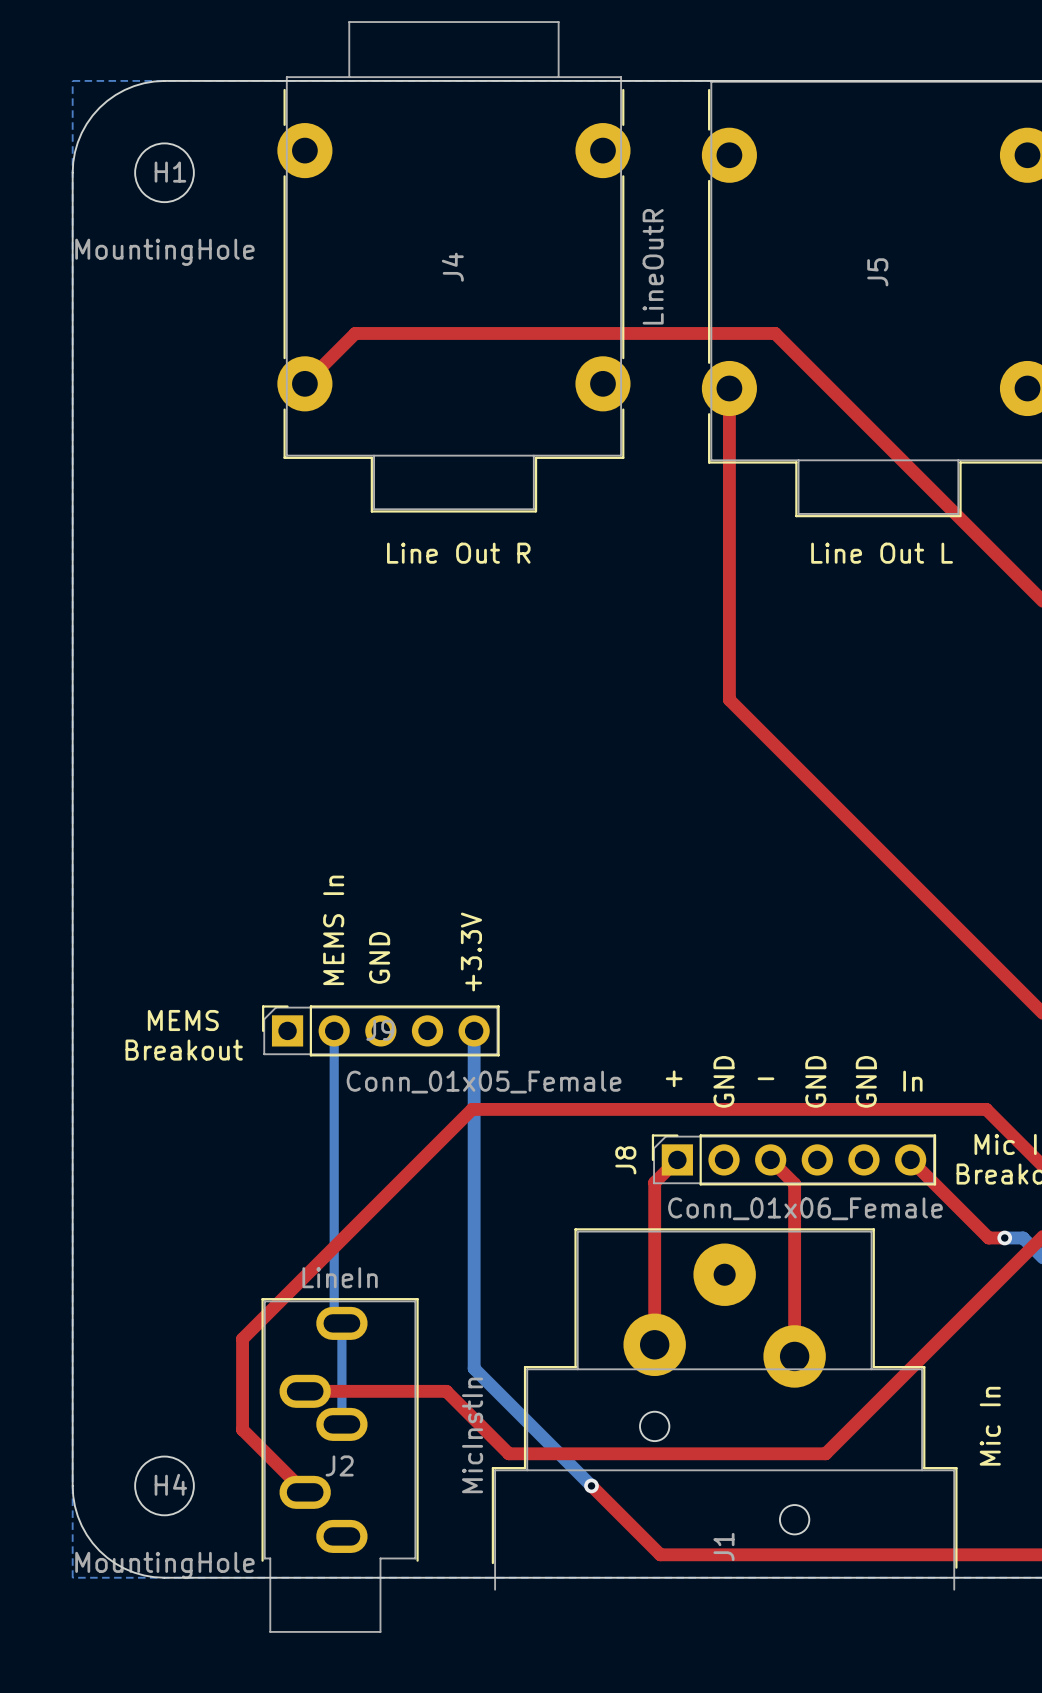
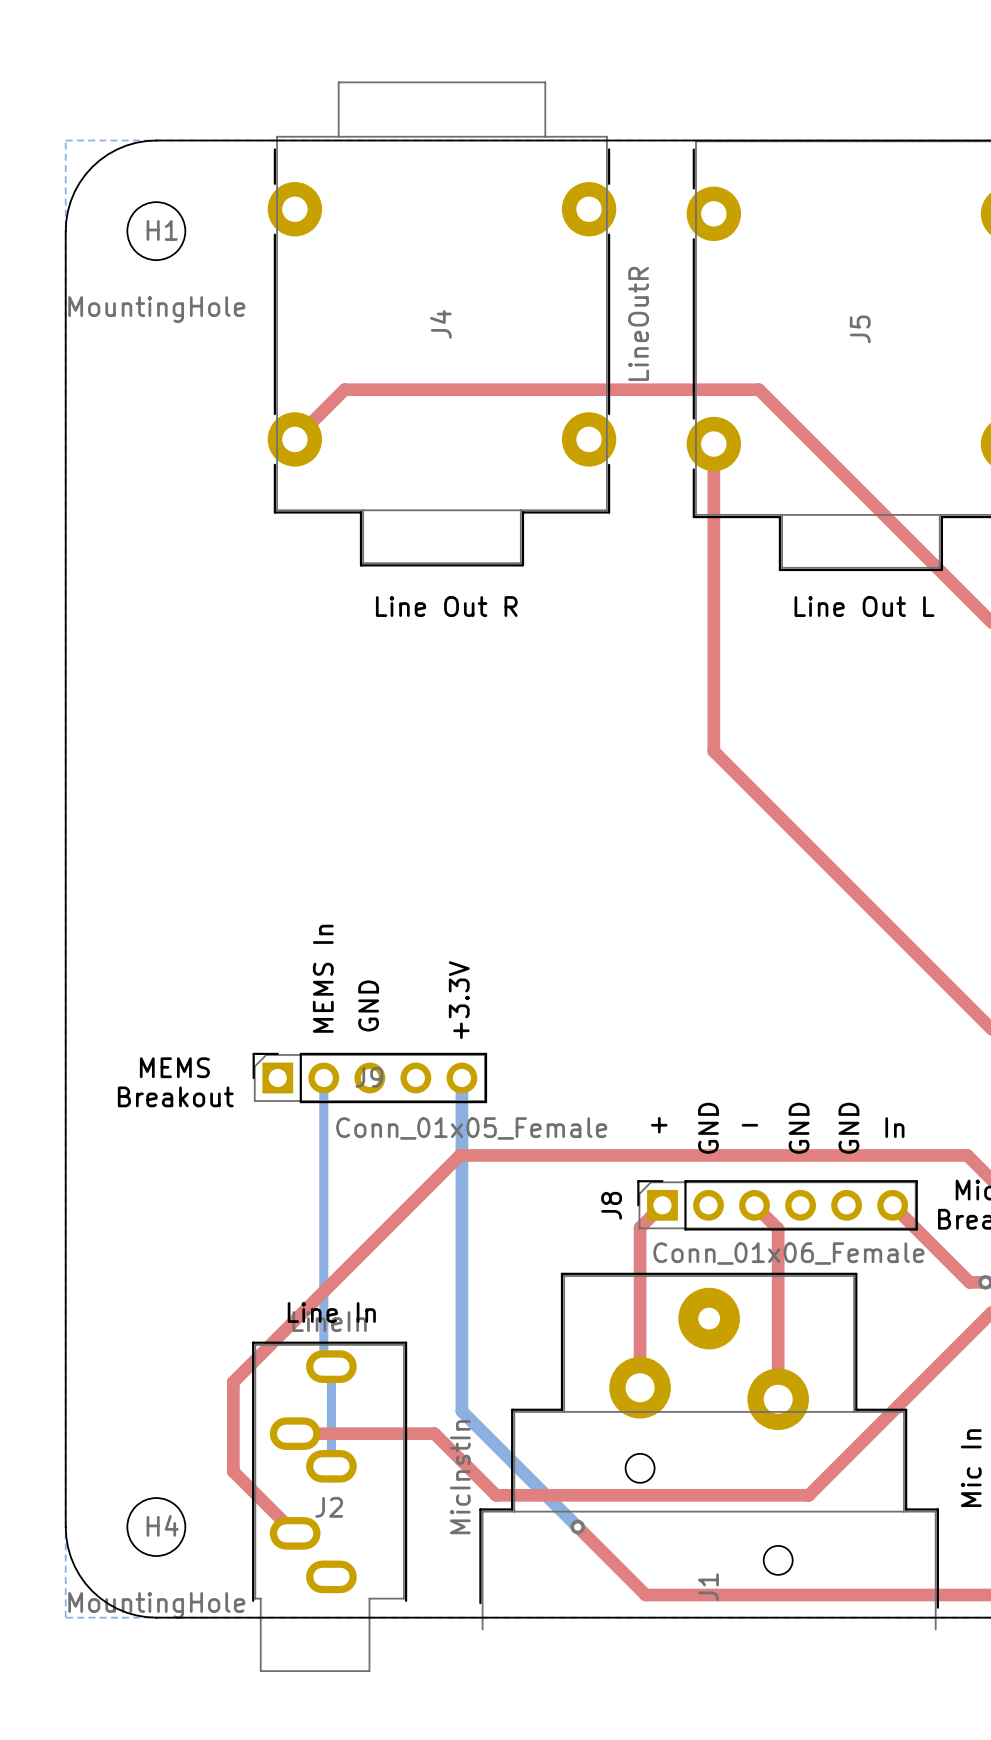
text: none -> Line In (331, 1312)

